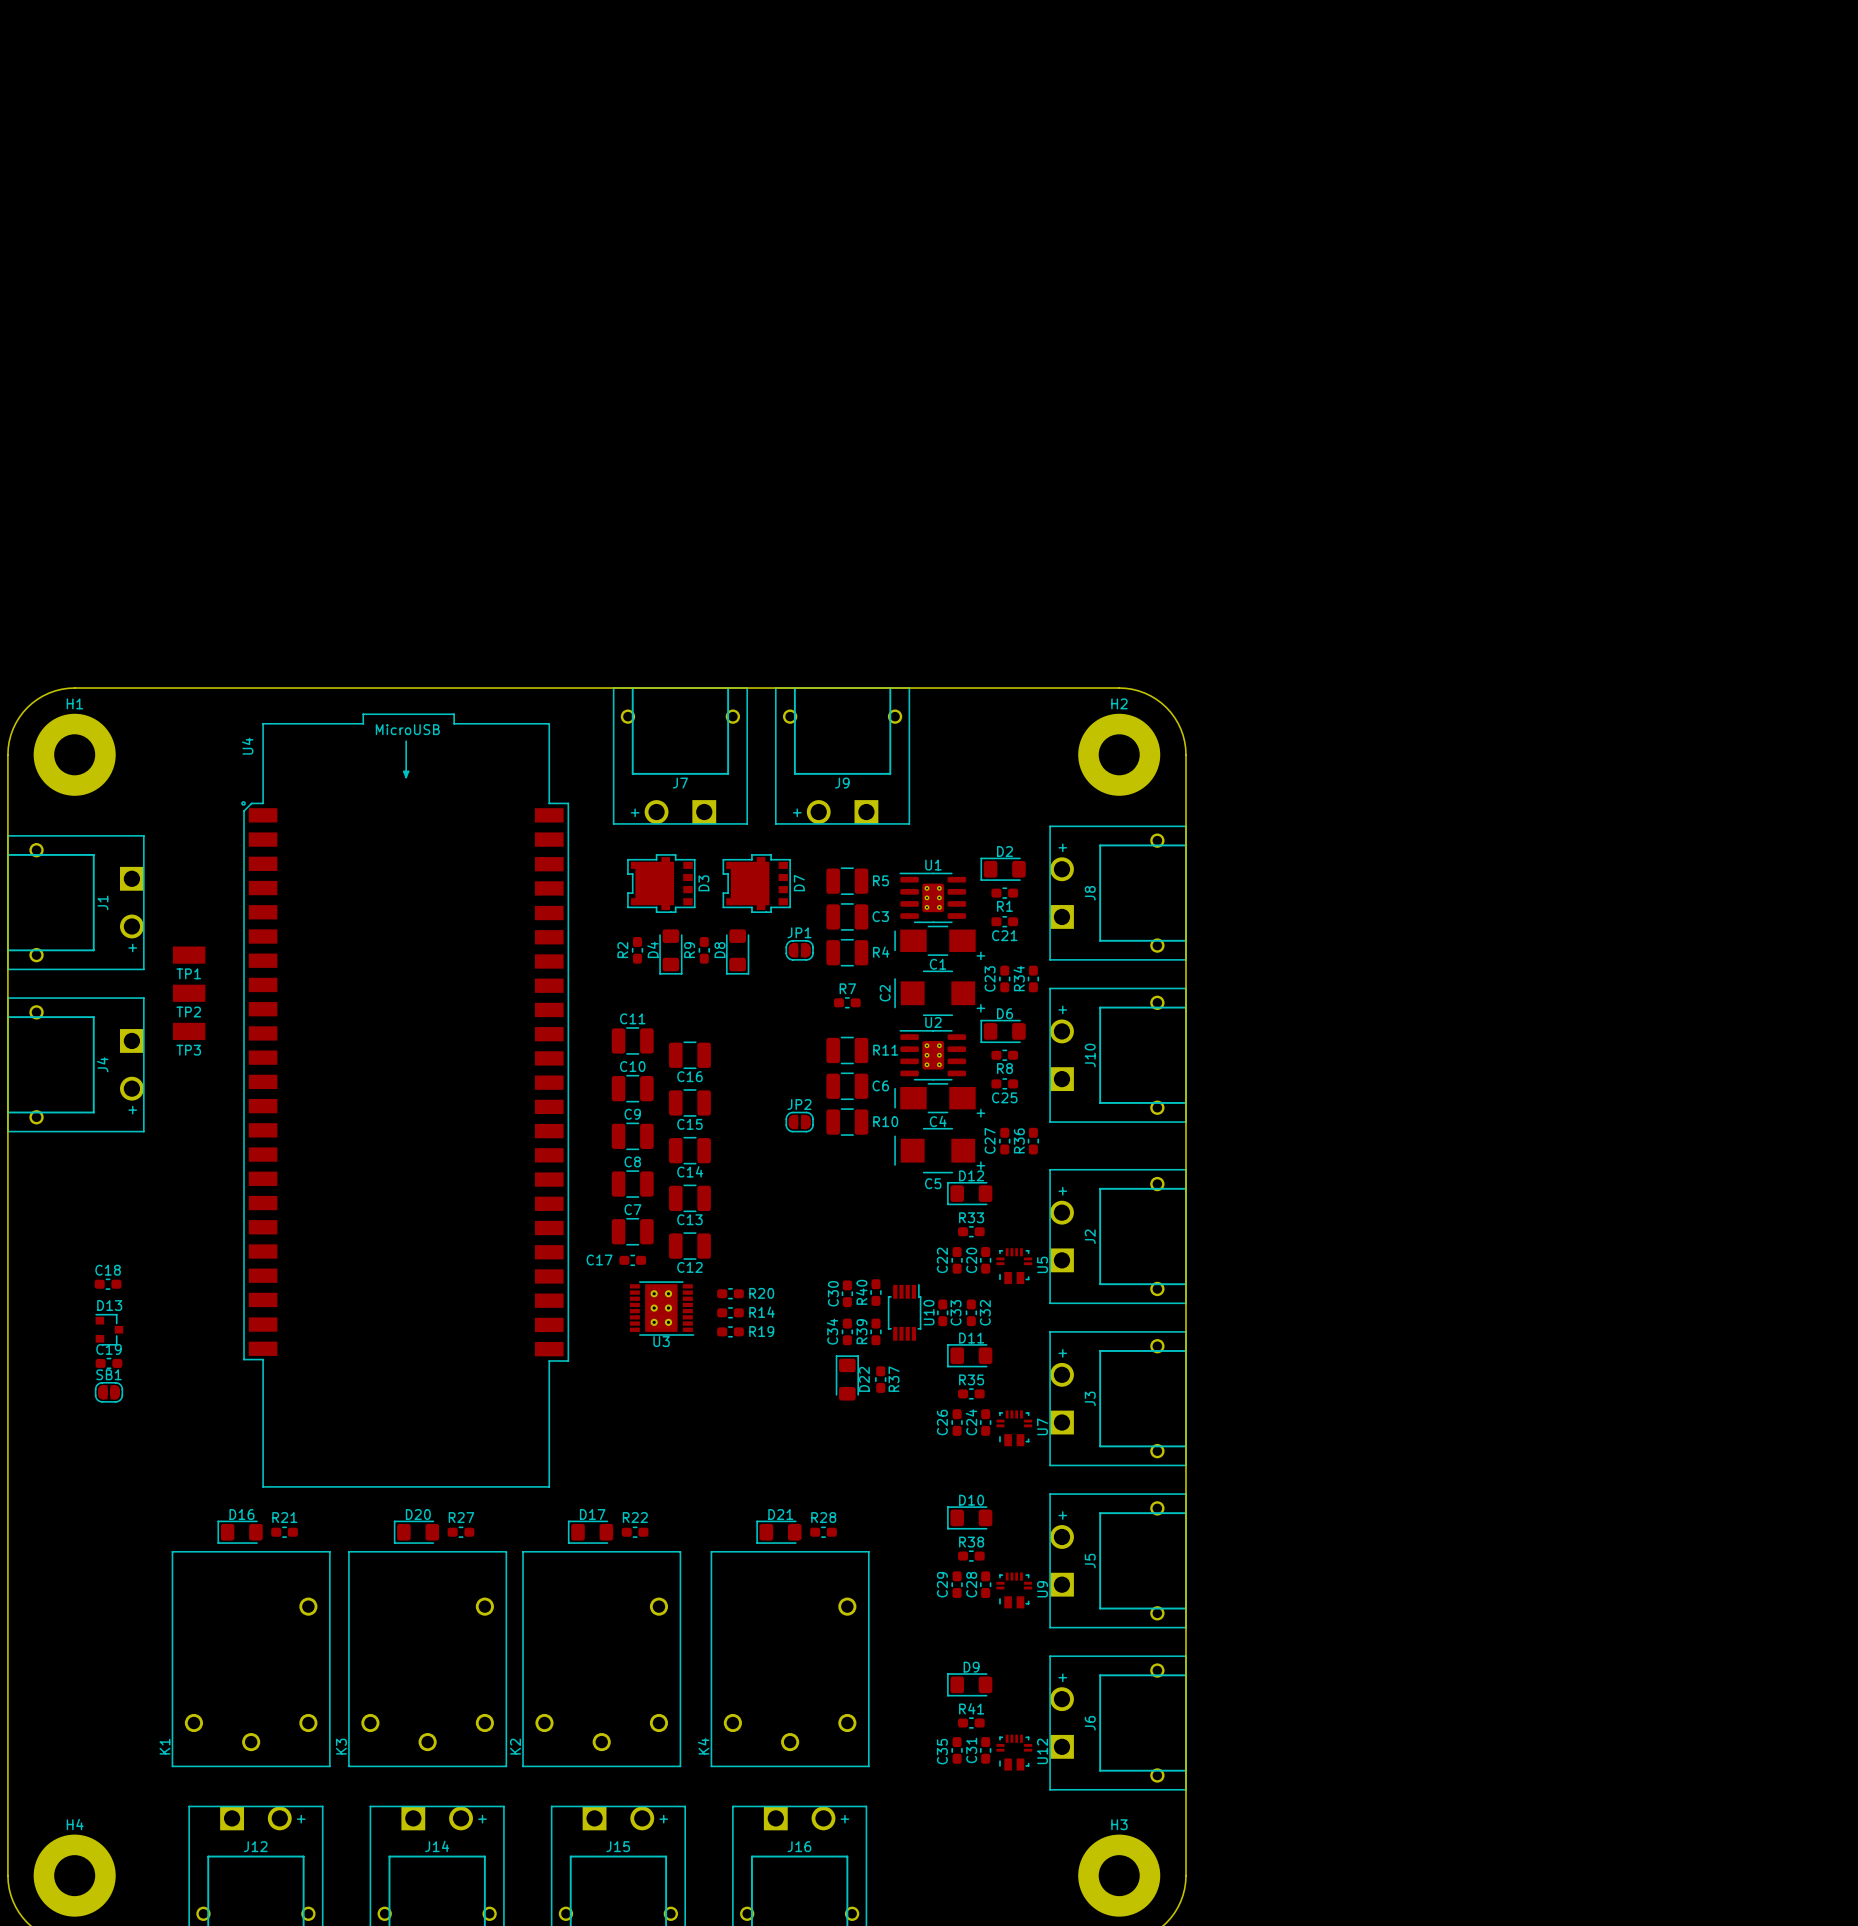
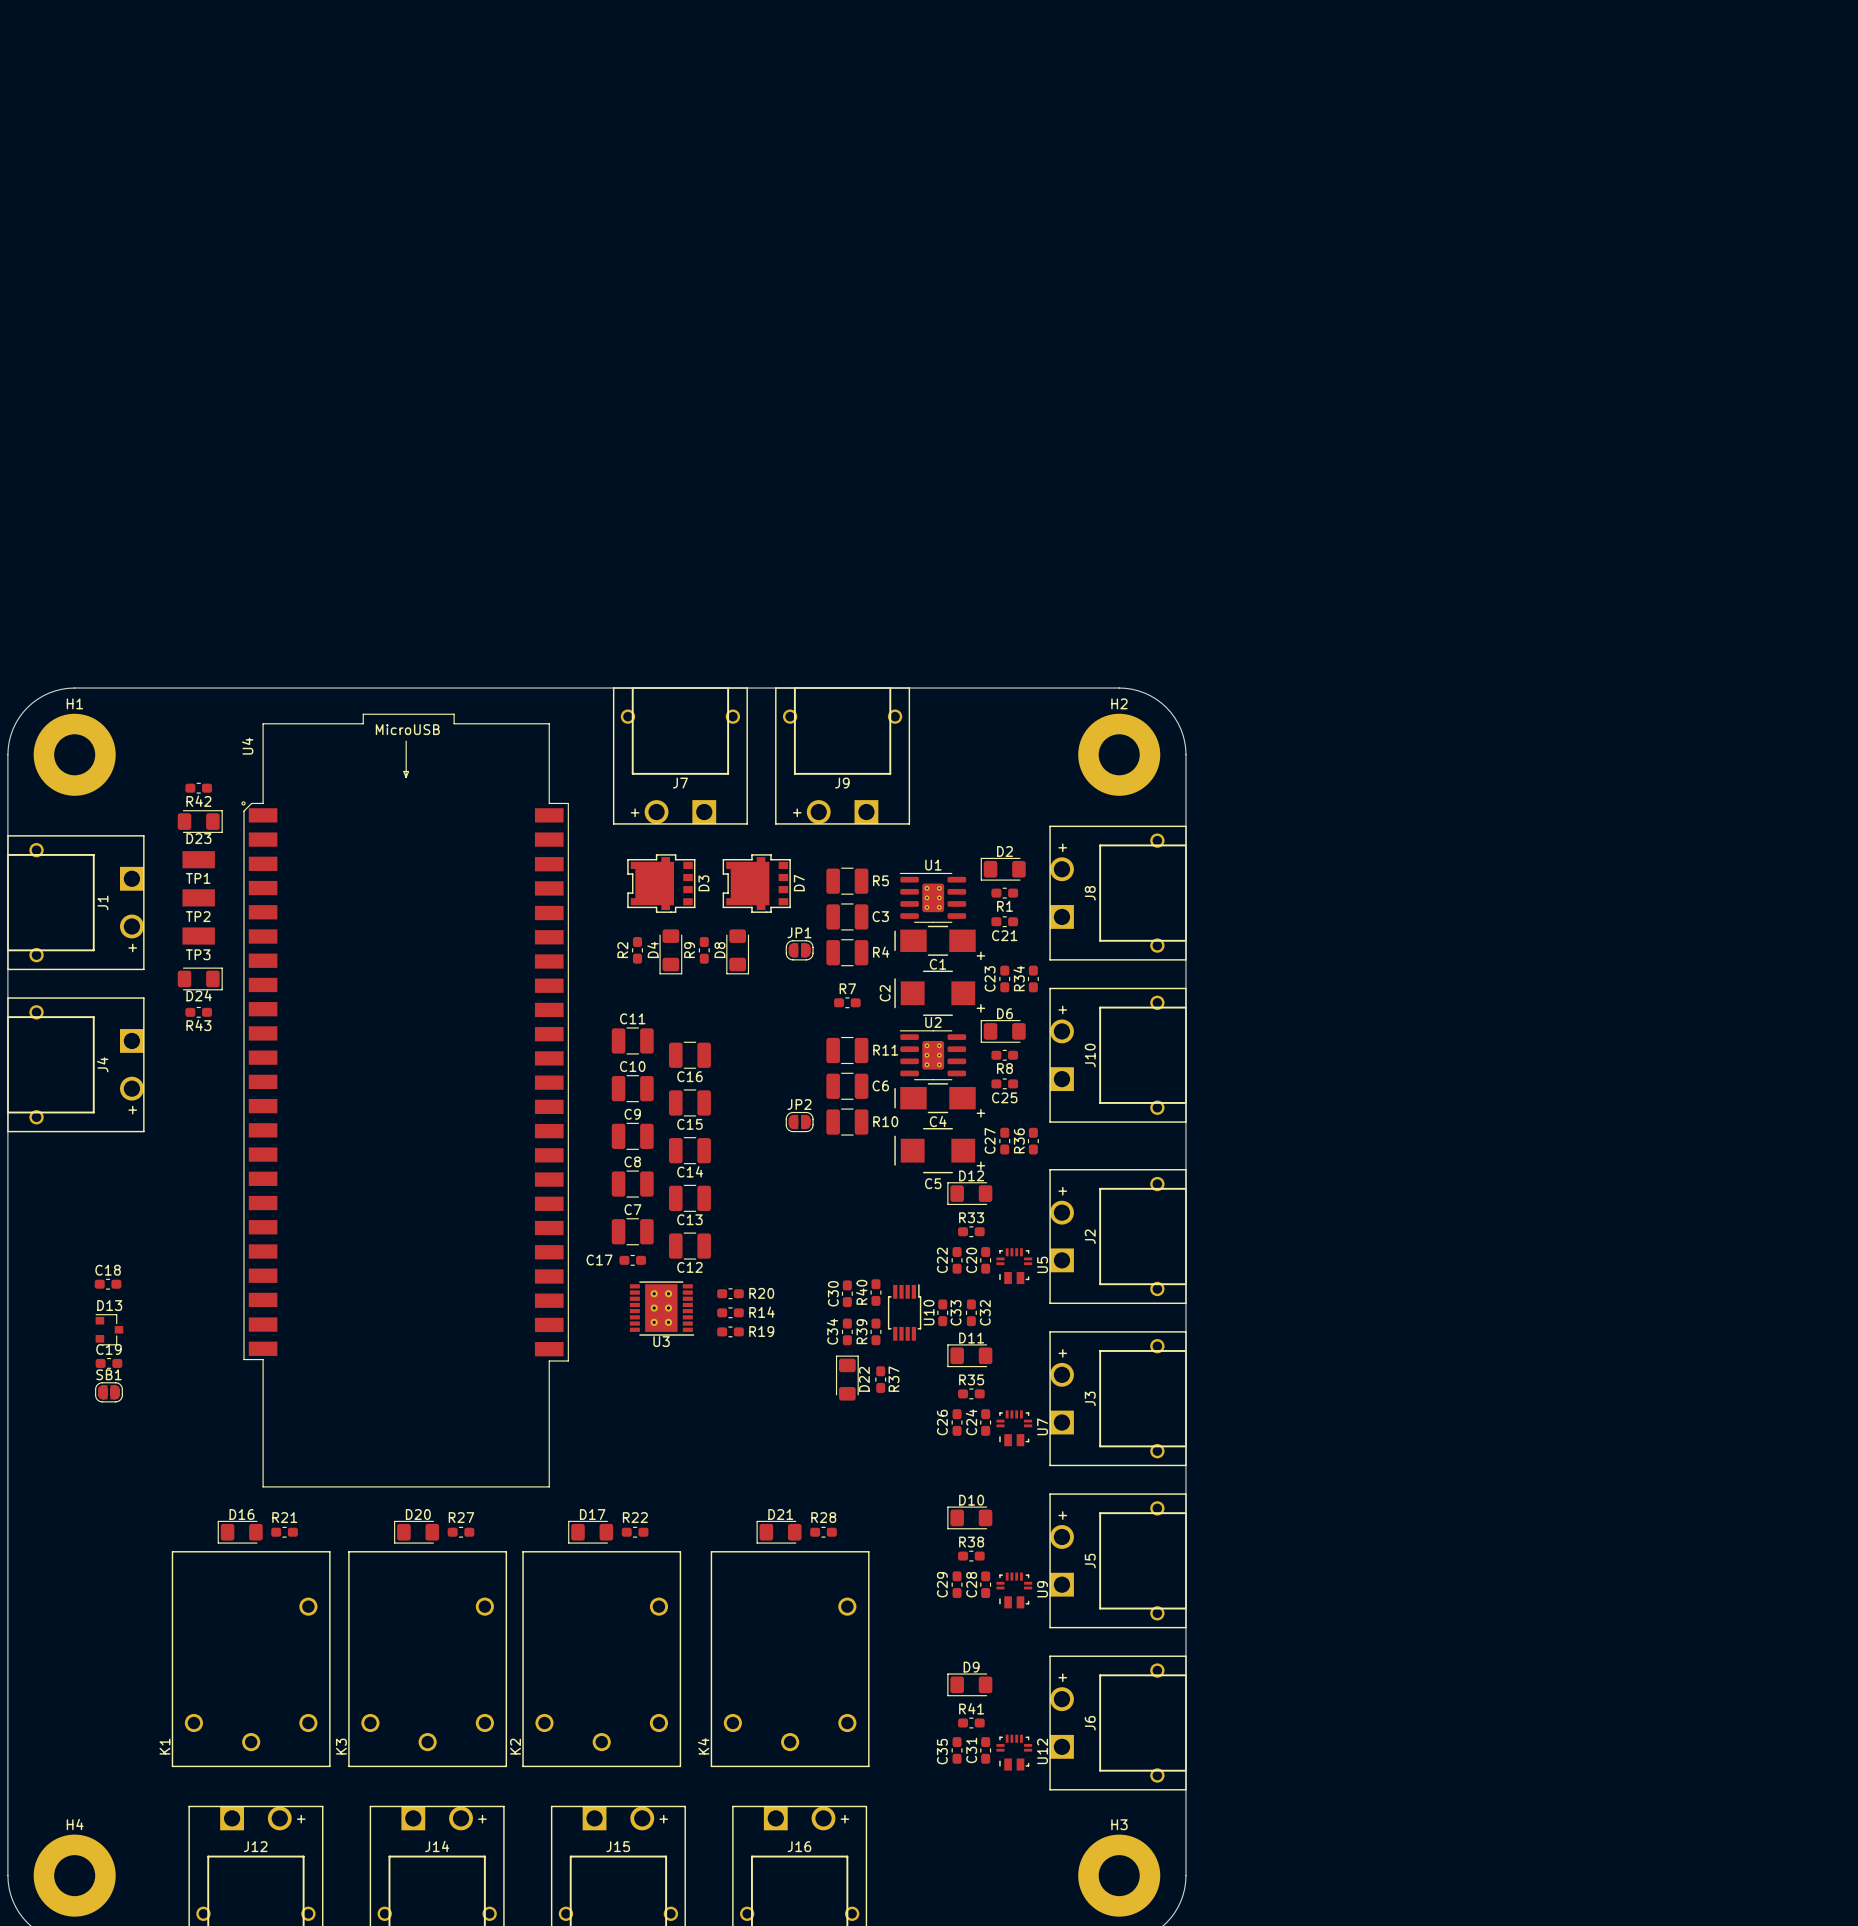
R42: none -> (198, 788)
D23: none -> (200, 821)
TP1 position: (189, 955) -> (198, 859)
D24: none -> (200, 978)
TP2 position: (189, 993) -> (198, 897)
R43: none -> (198, 1012)
TP3 position: (189, 1031) -> (198, 936)

